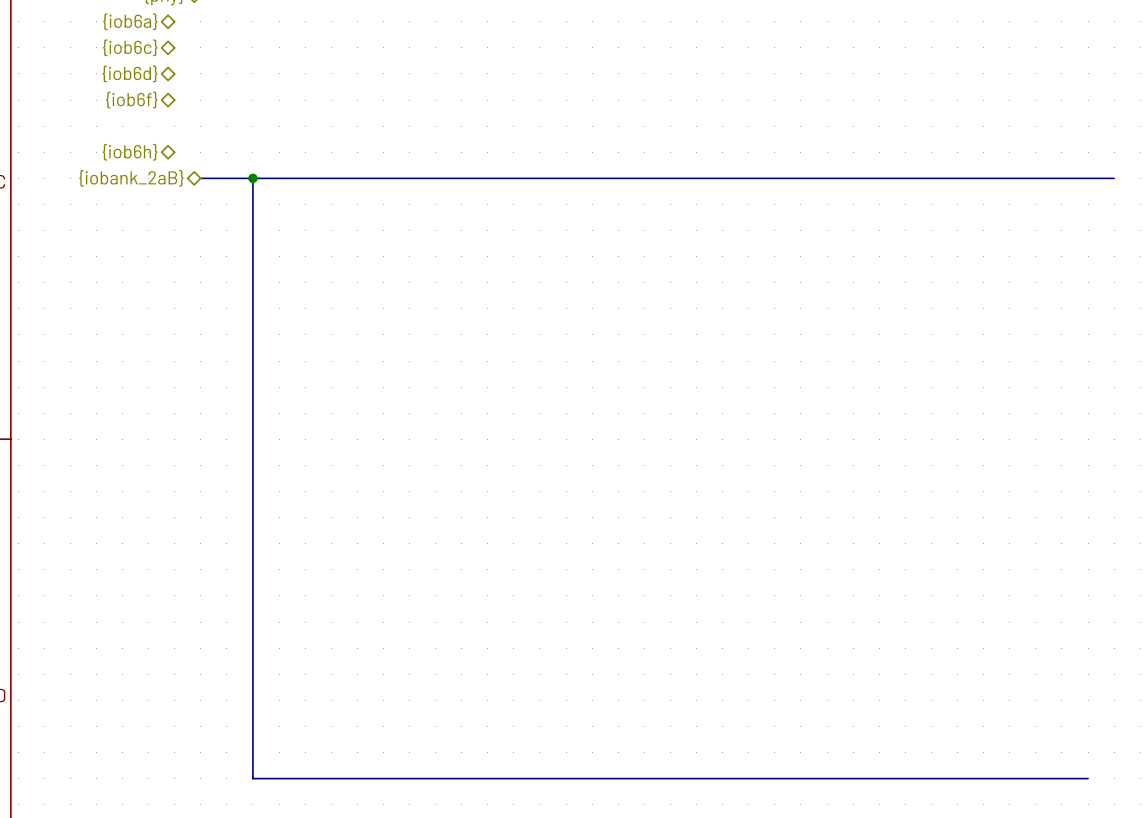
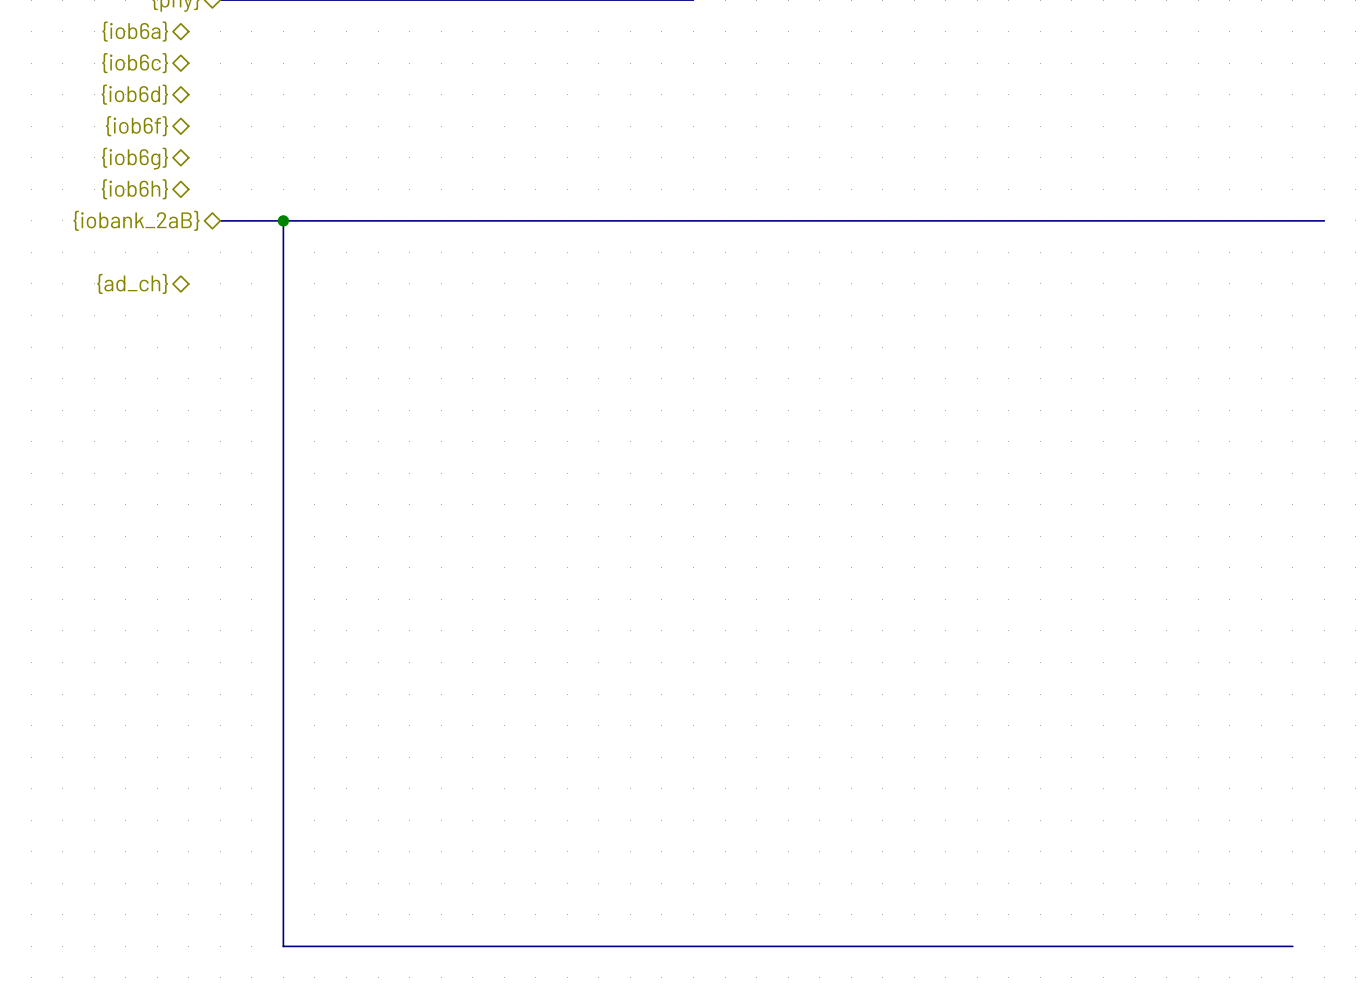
hierarchical label: none -> {iob6g} (134, 158)
hierarchical label: none -> {ad_ch} (132, 283)

